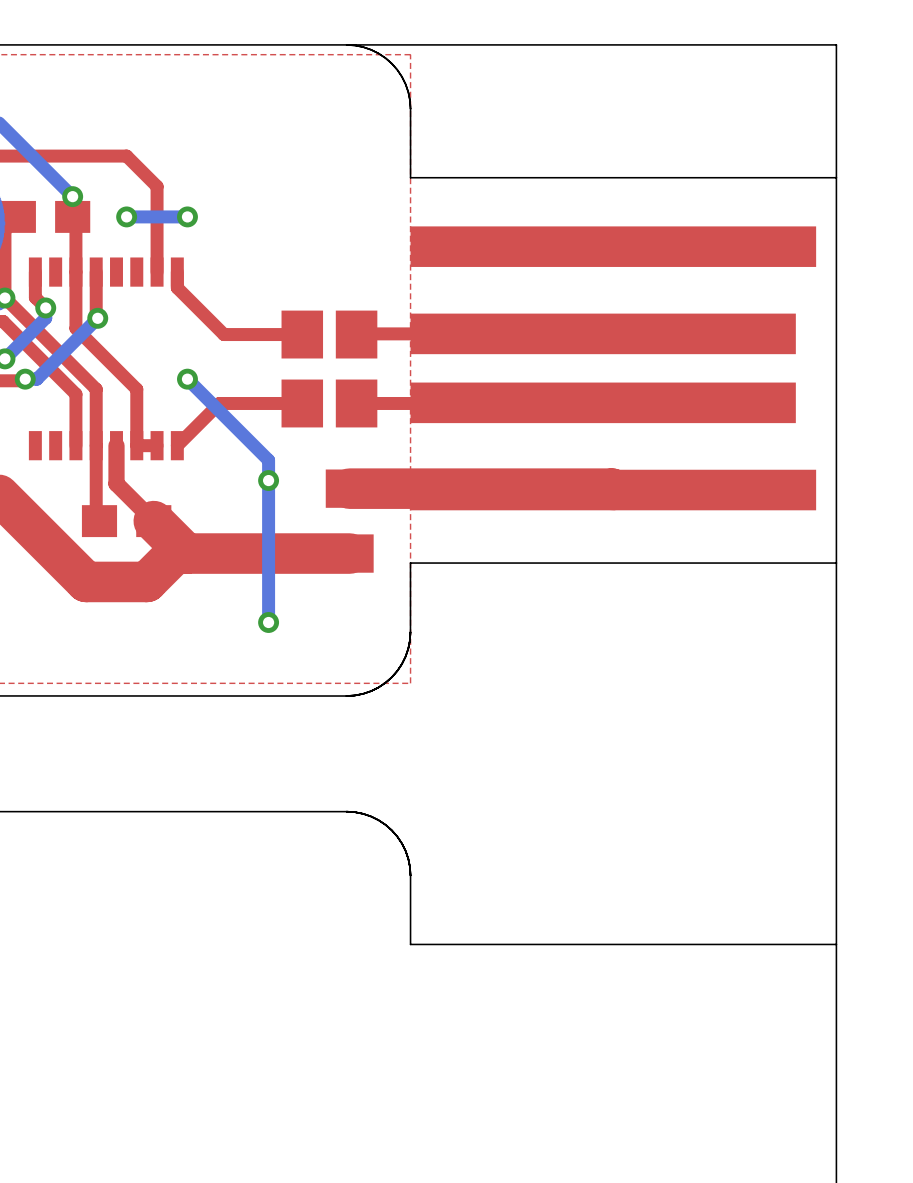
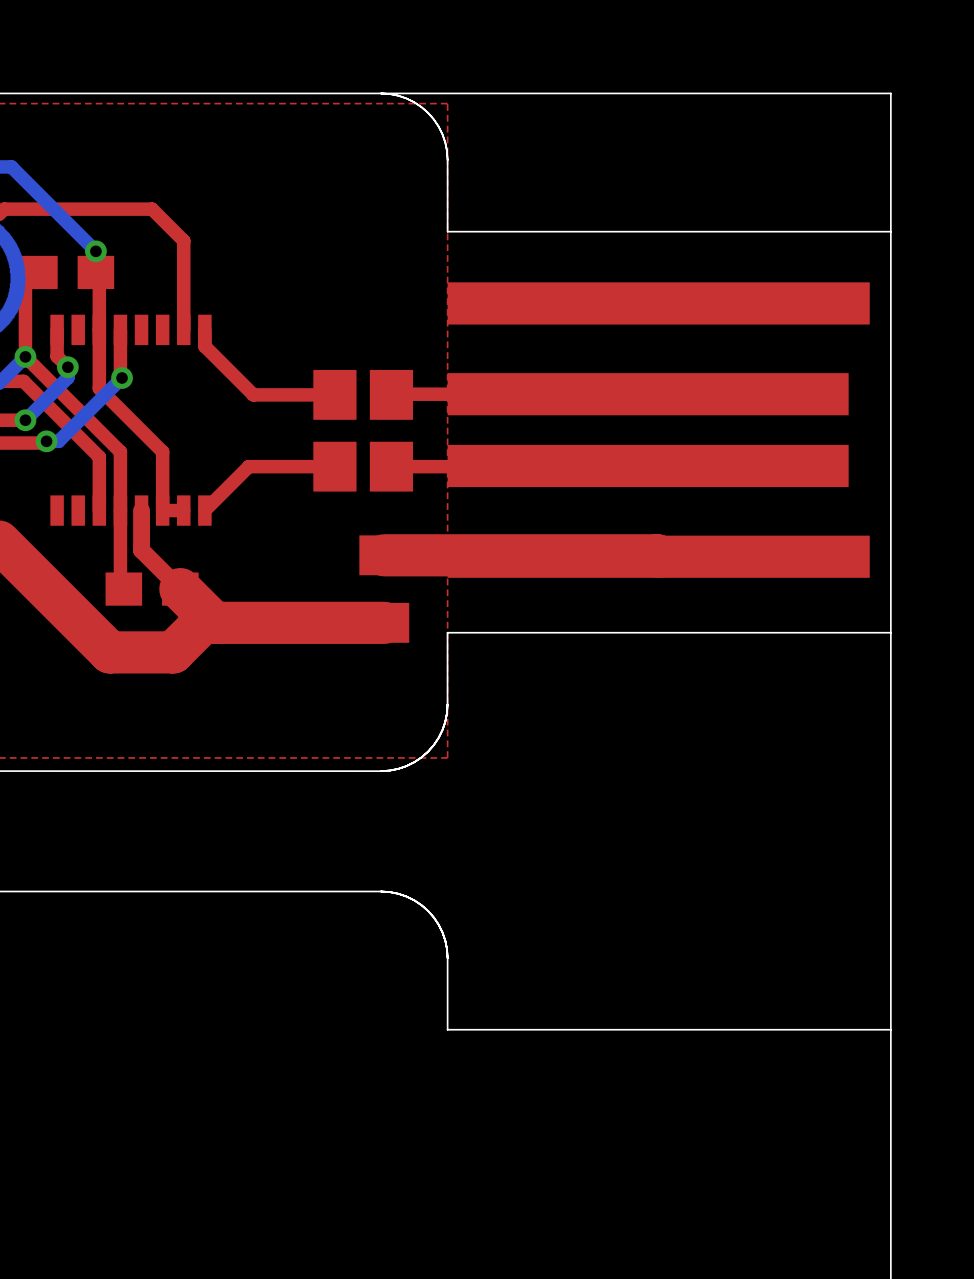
via: (126, 216) -> none
bottom track: (187, 216) (126, 216) -> none
via: (187, 216) -> none
bottom track: (187, 379) (268, 460) (268, 622) -> none
via: (187, 379) -> none
via: (268, 480) -> none
via: (268, 622) -> none

